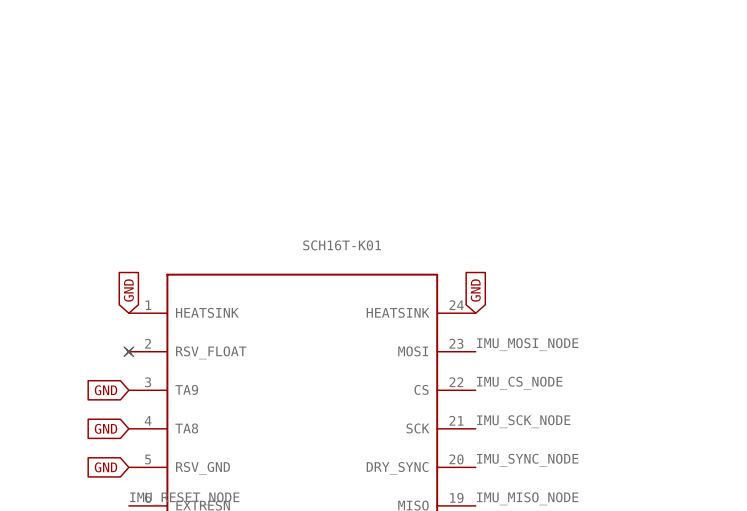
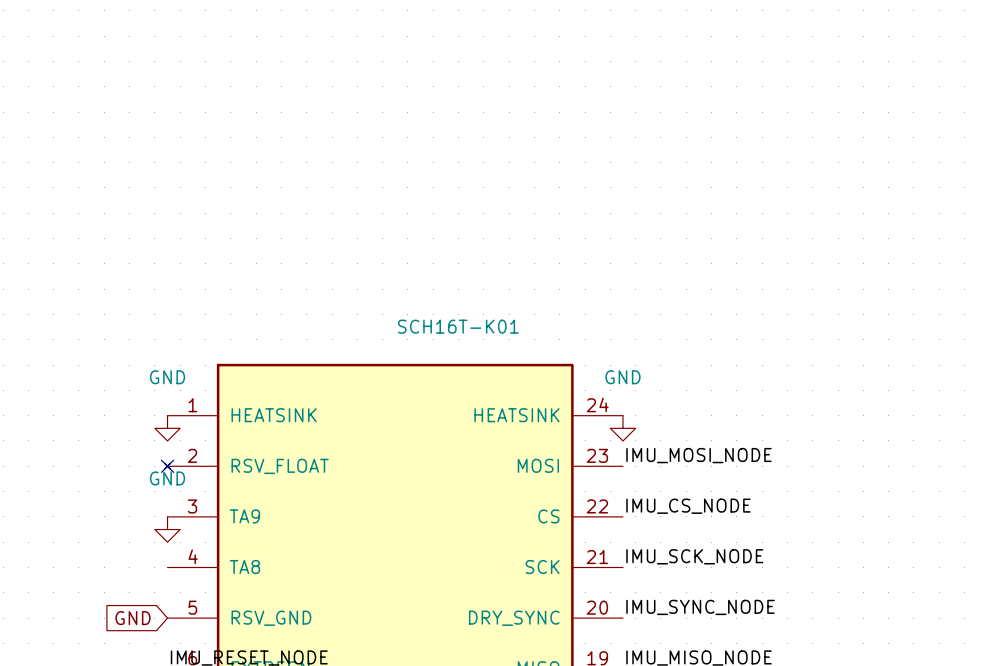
global label: GND (128, 290) -> none
global label: GND (475, 290) -> none
power symbol: none -> GND (167, 428)
power symbol: none -> GND (622, 428)
global label: GND (106, 390) -> none
power symbol: none -> GND (167, 529)
global label: GND (106, 428) -> none

